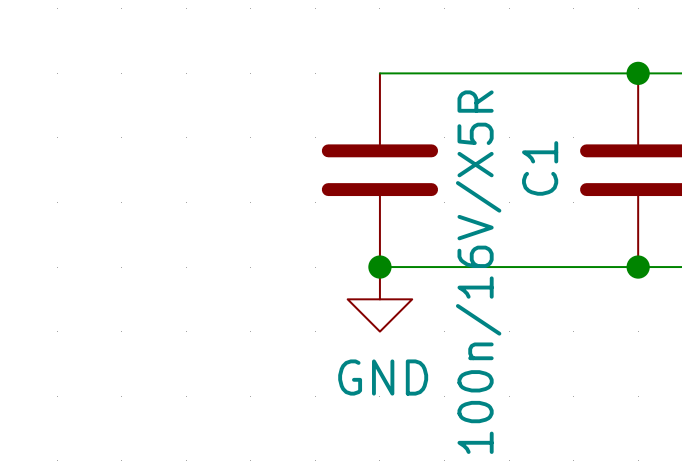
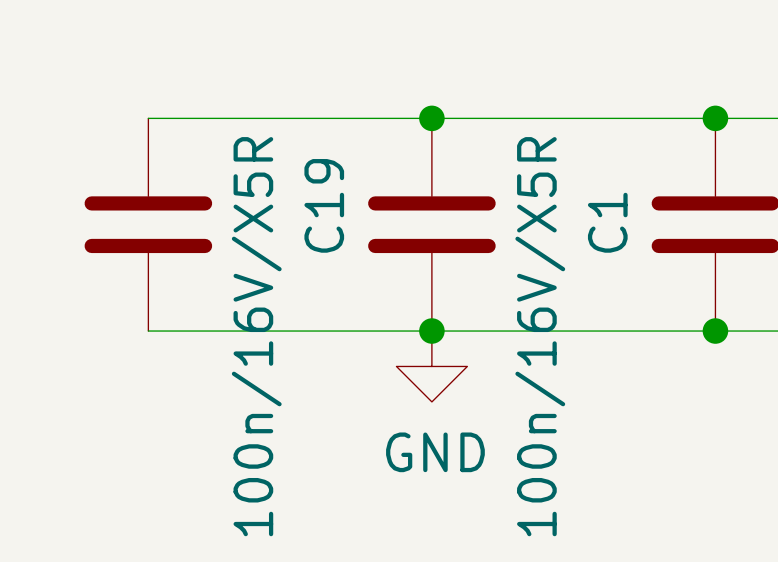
wire: none -> (148, 118) (431, 118)
junction: none -> (431, 118)
C19: none -> 100n/16V/X5R (148, 224)
wire: none -> (148, 331) (431, 331)

